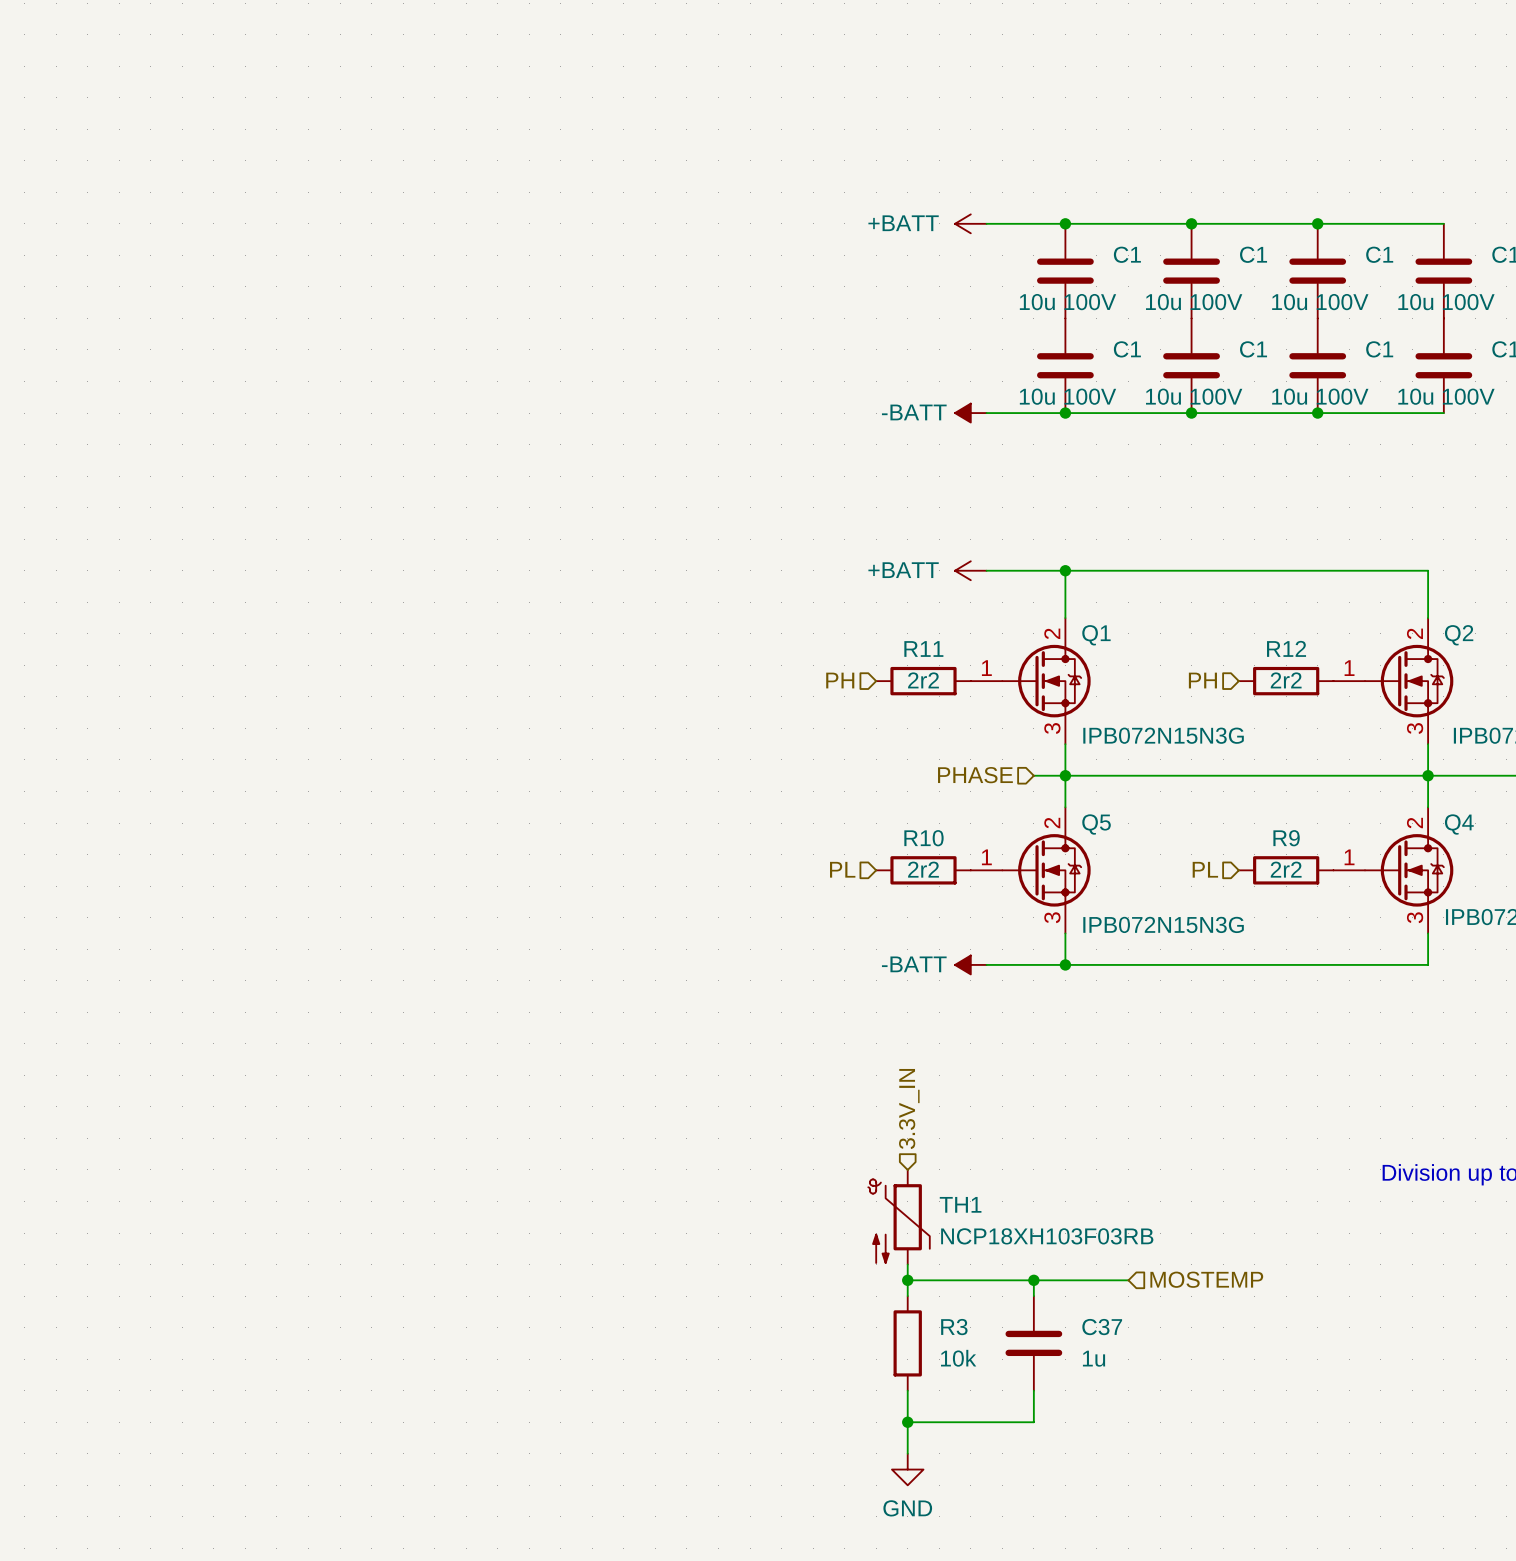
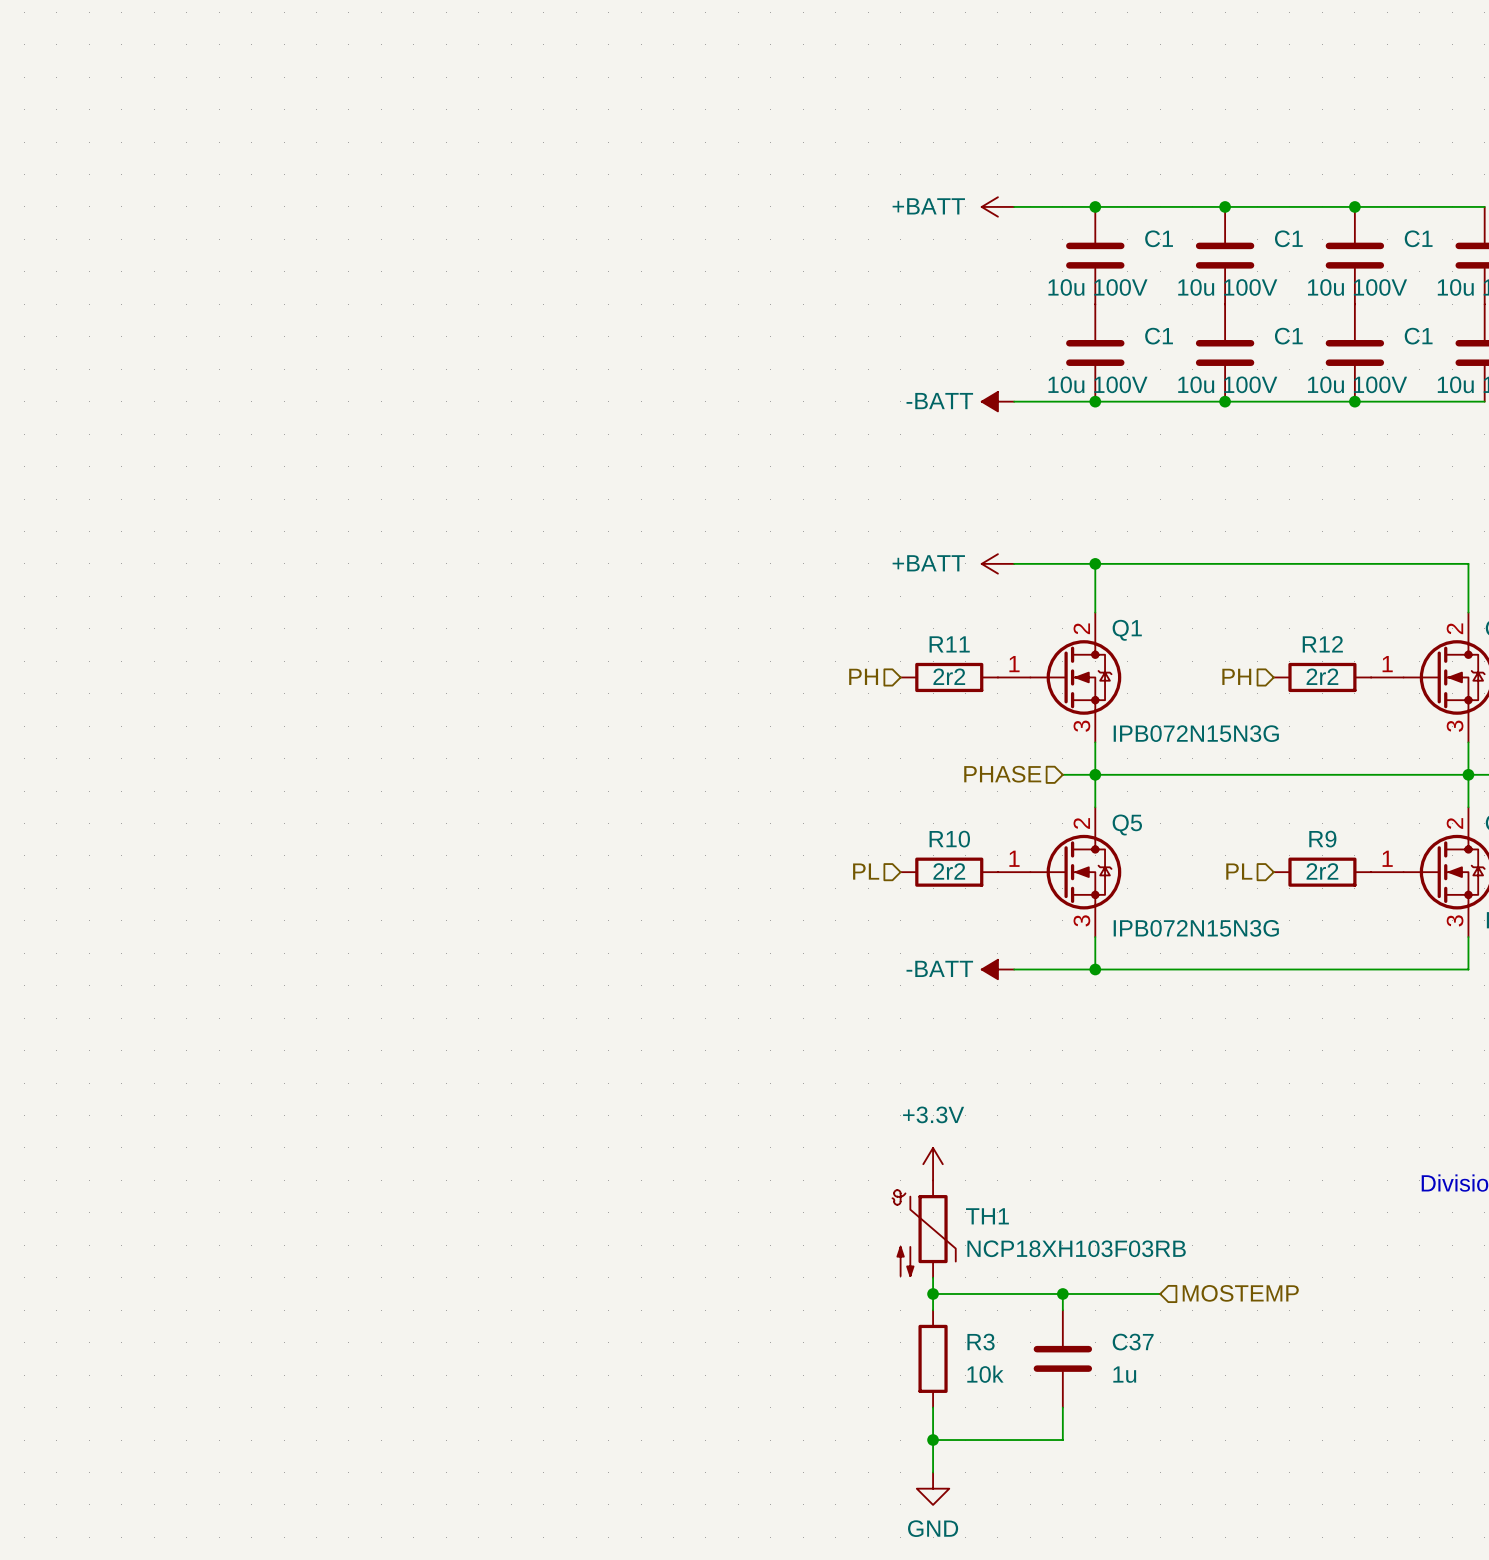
hierarchical label: 3.3V_IN (909, 1109) -> none
power symbol: none -> +3.3V (933, 1164)

